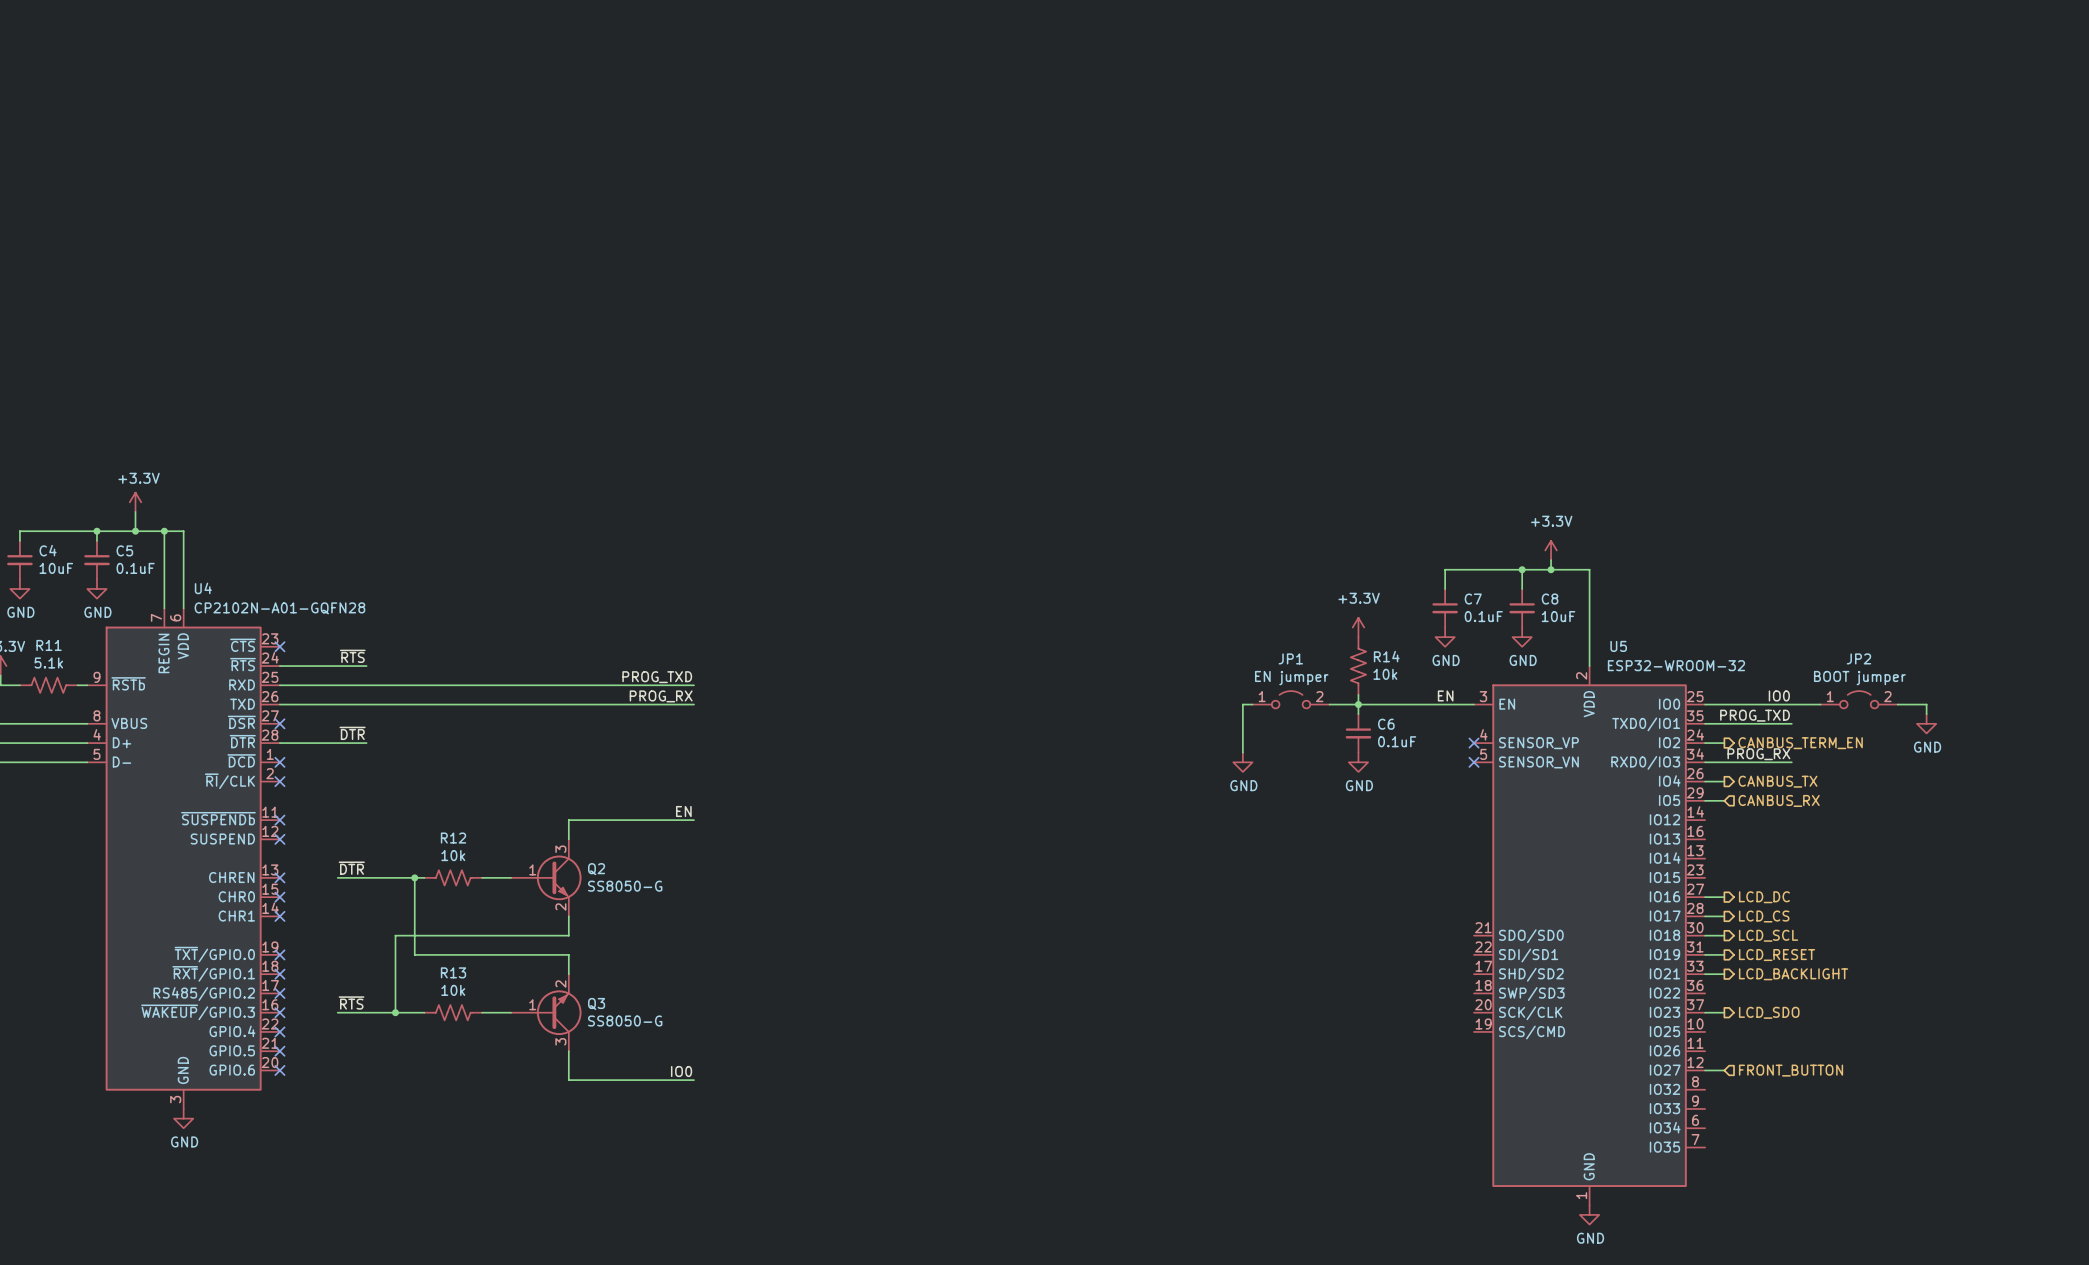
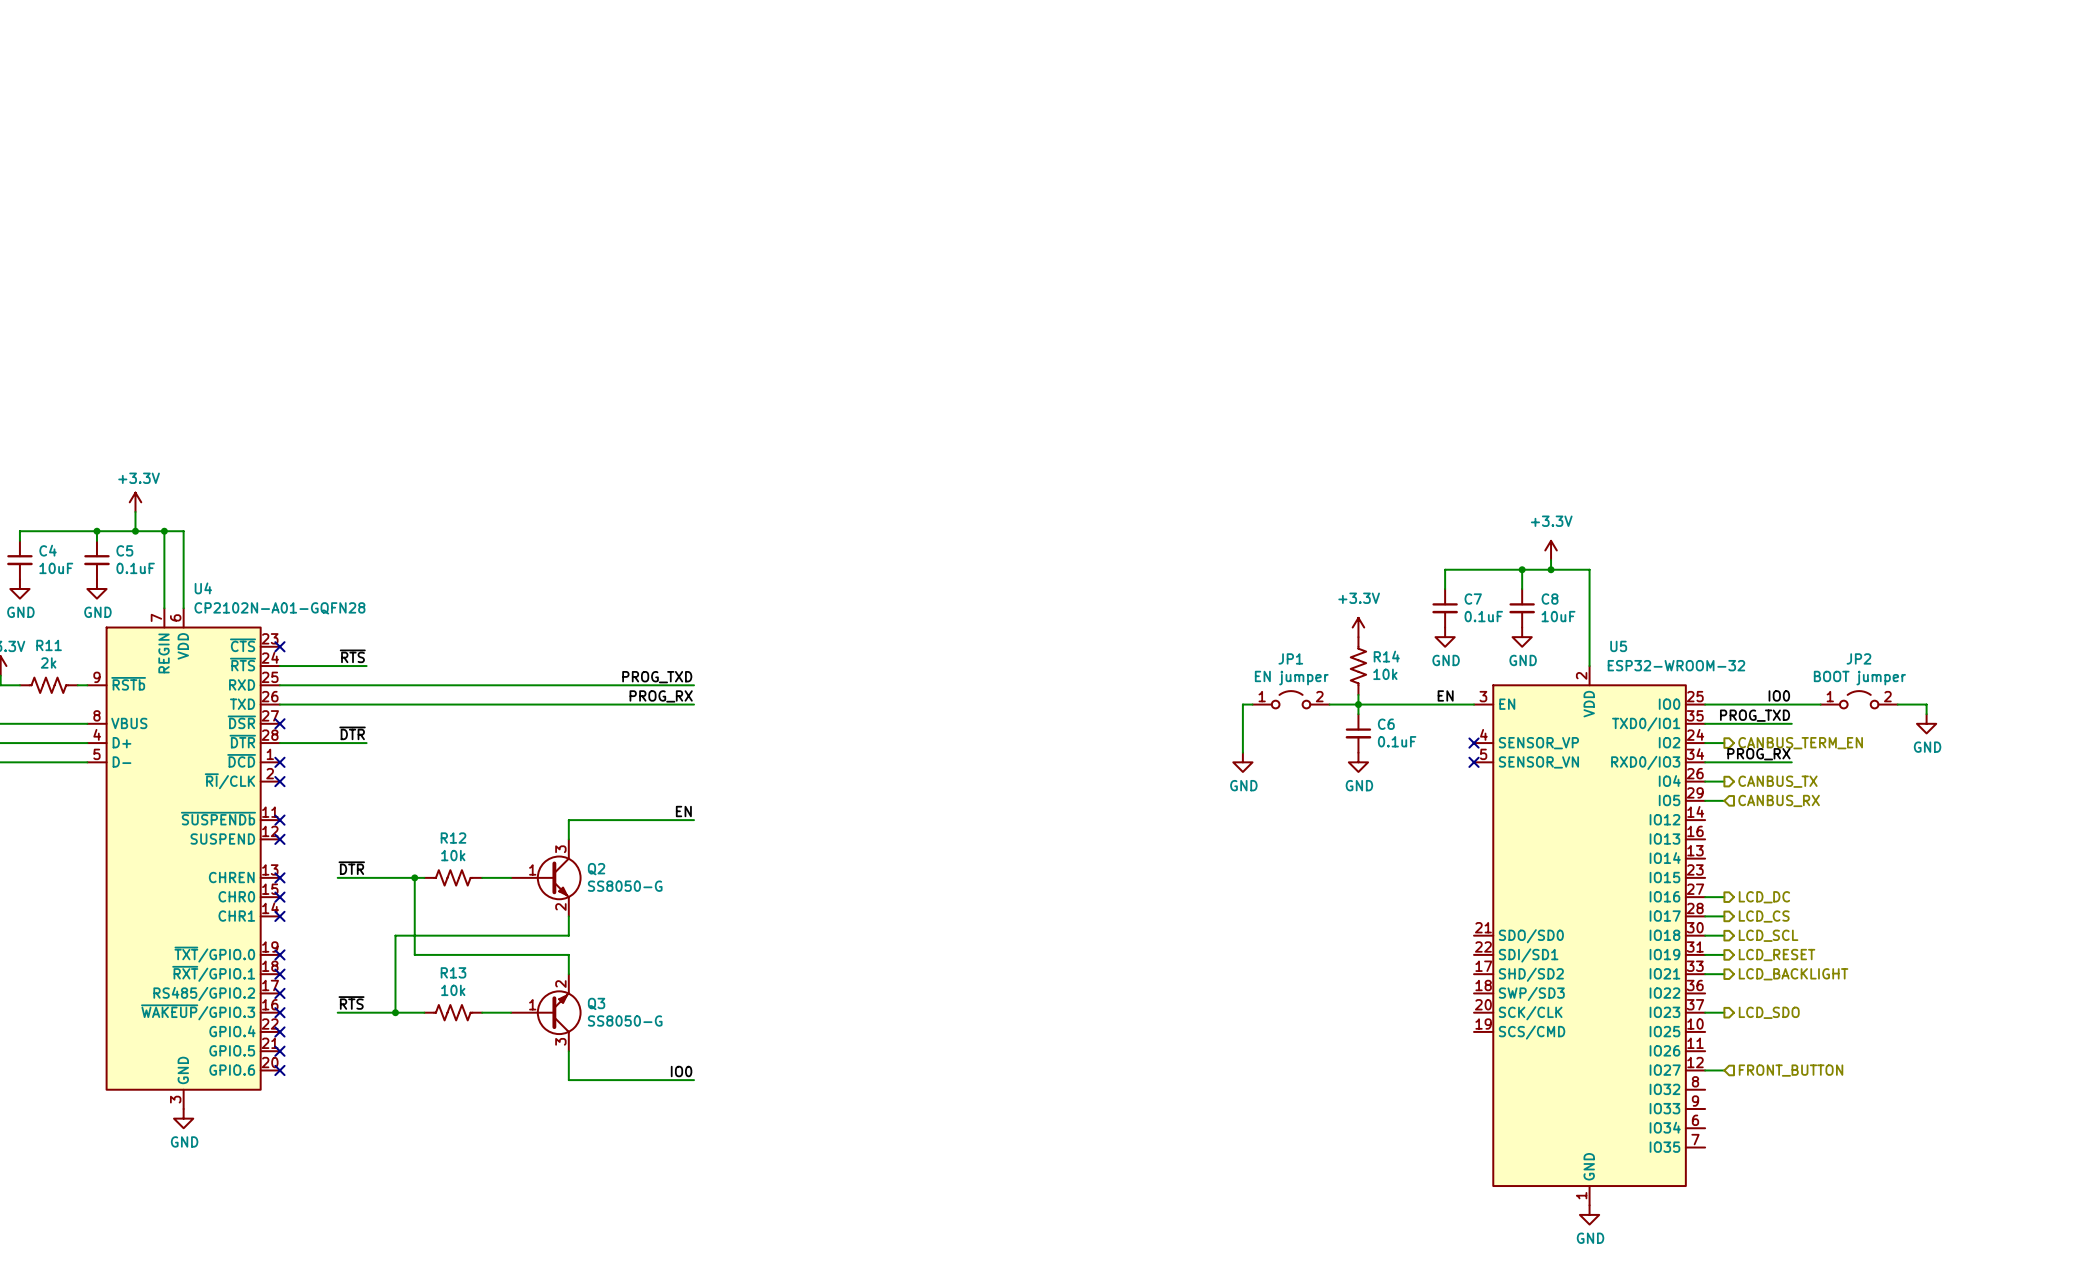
R11 value: 5.1k (48, 662) -> 2k (48, 662)

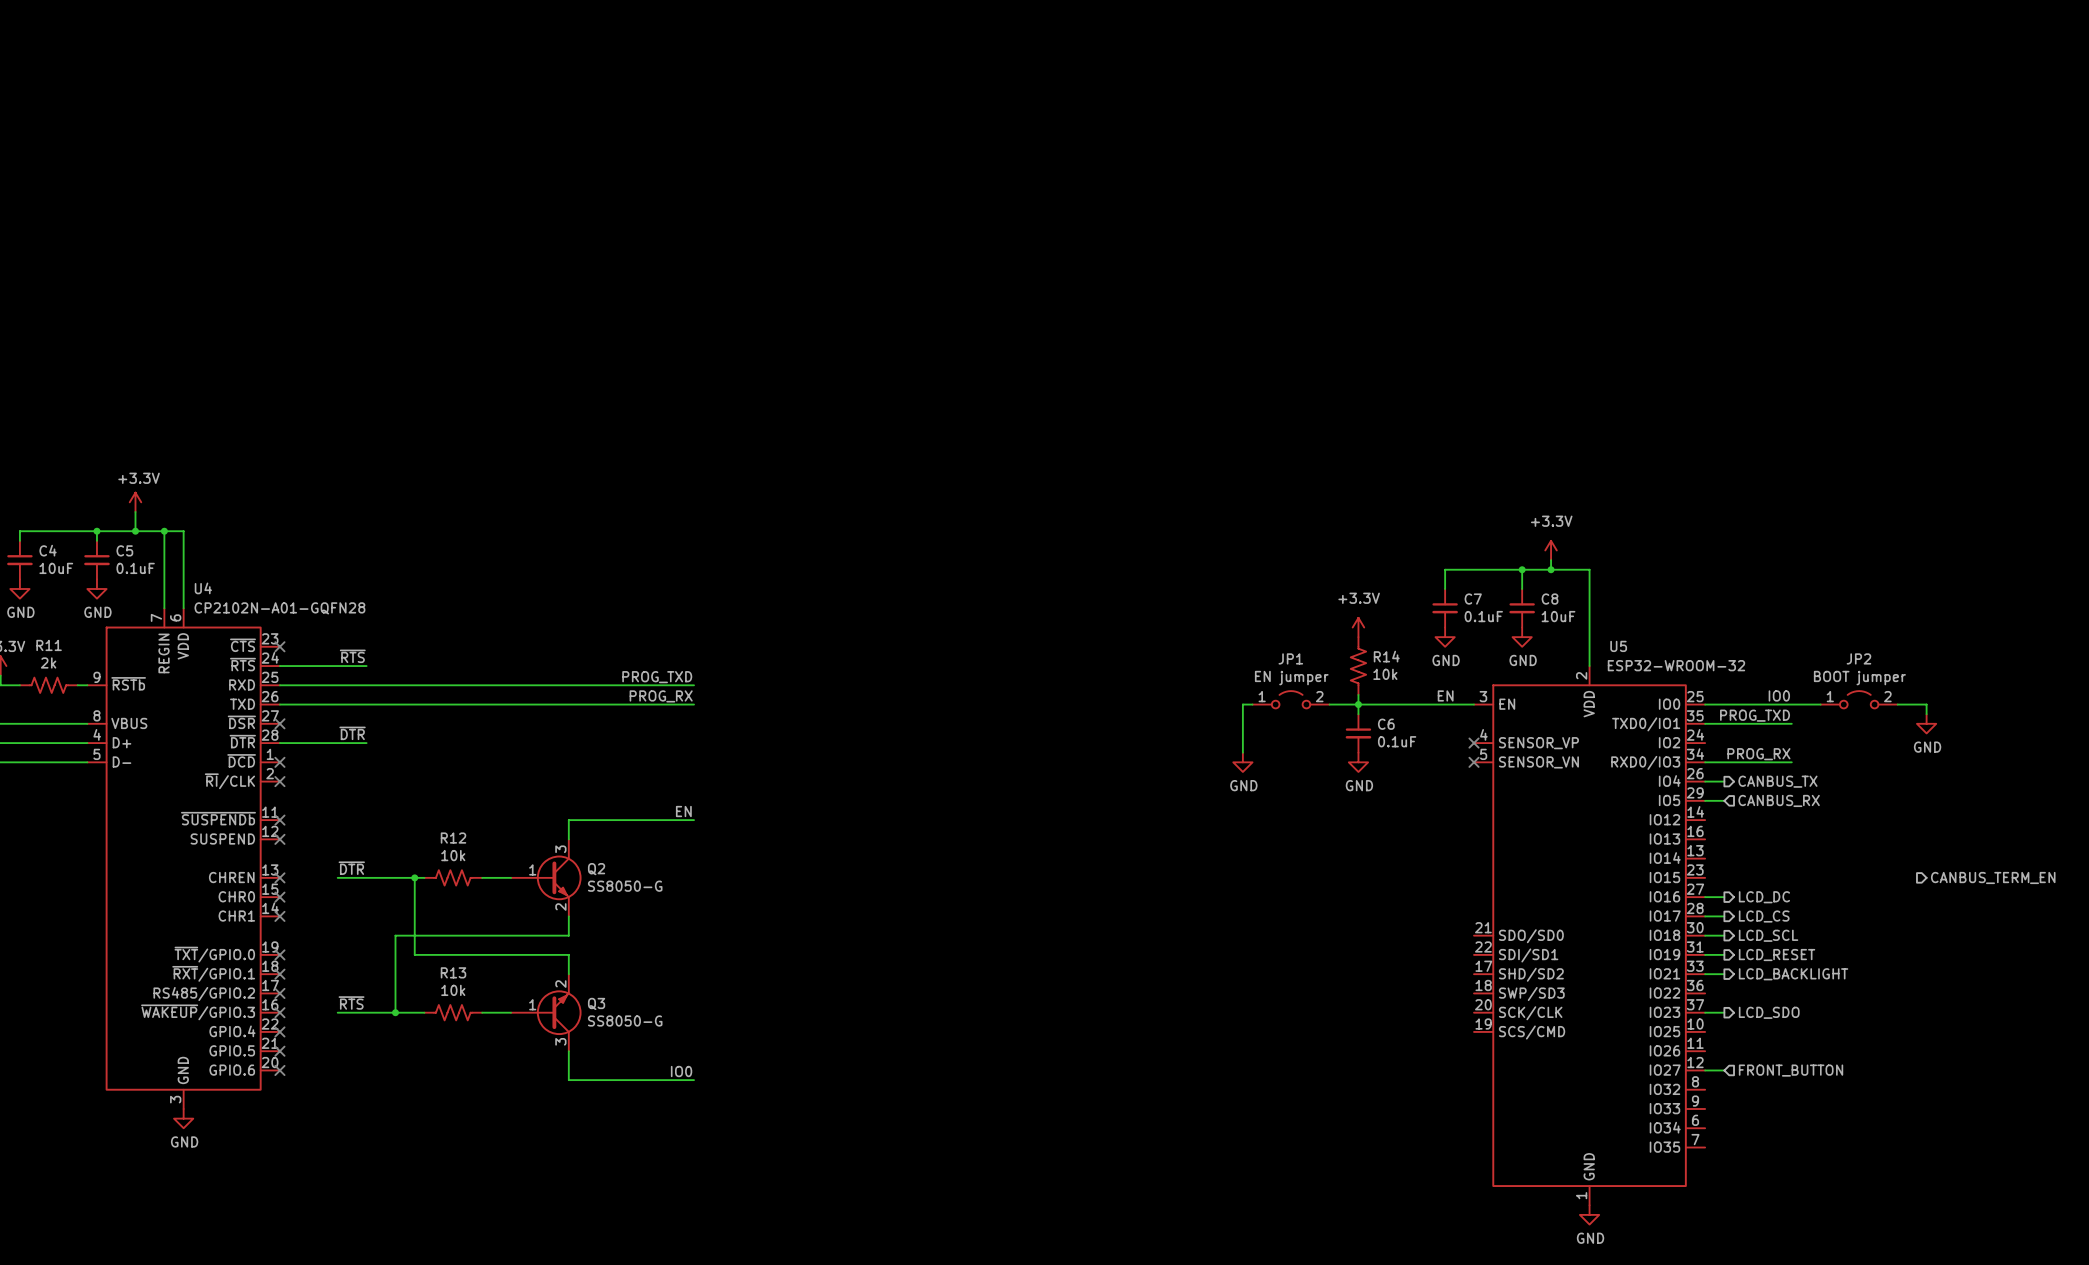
wire: (1705, 743) (1724, 743) -> none
hierarchical label: CANBUS_TERM_EN (1800, 743) -> none
hierarchical label: none -> CANBUS_TERM_EN (1993, 877)

